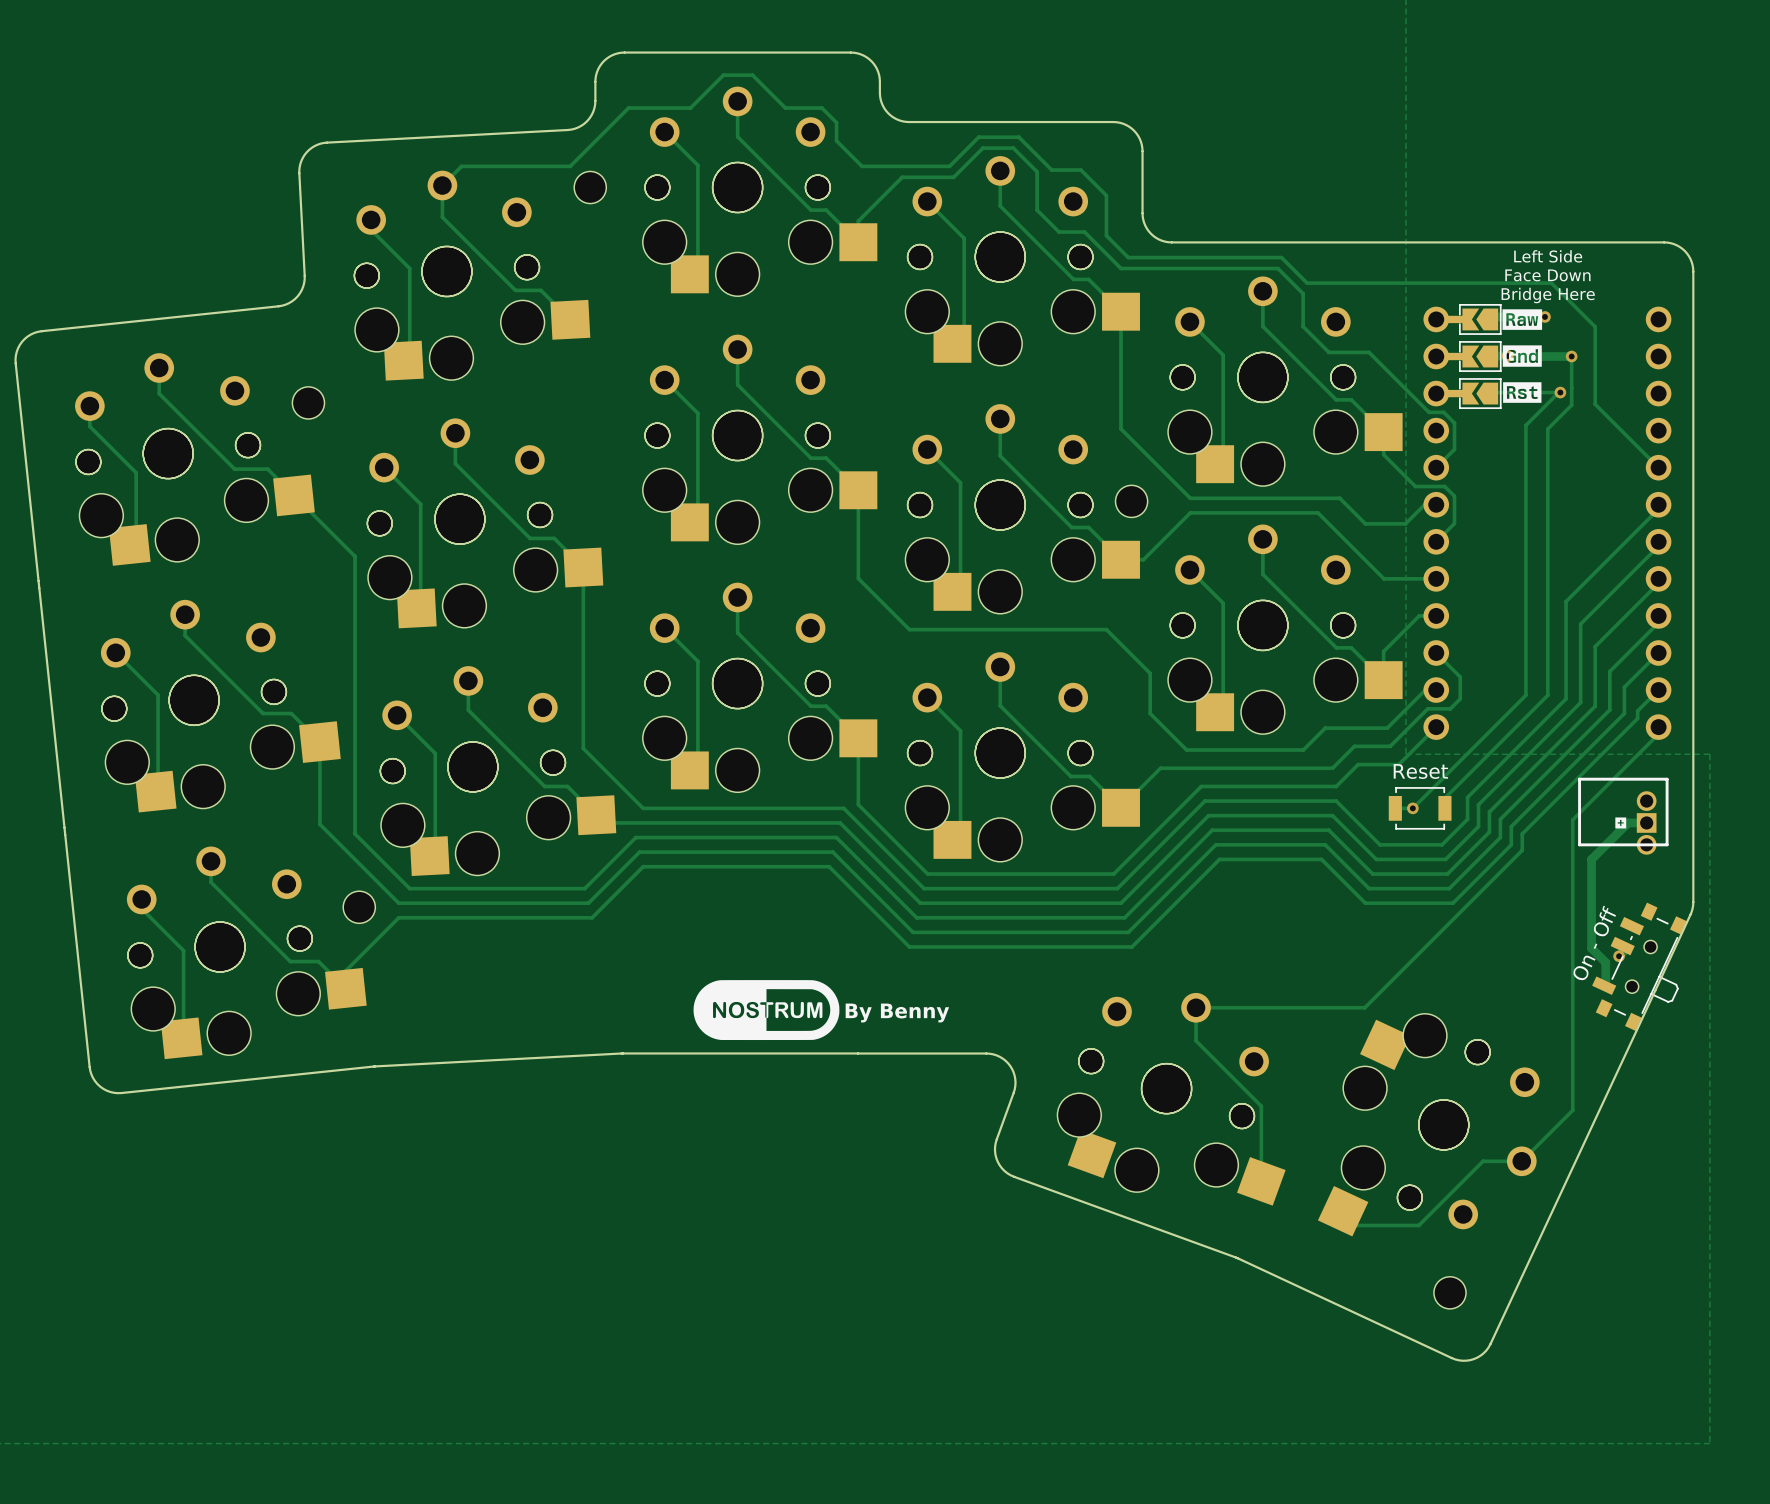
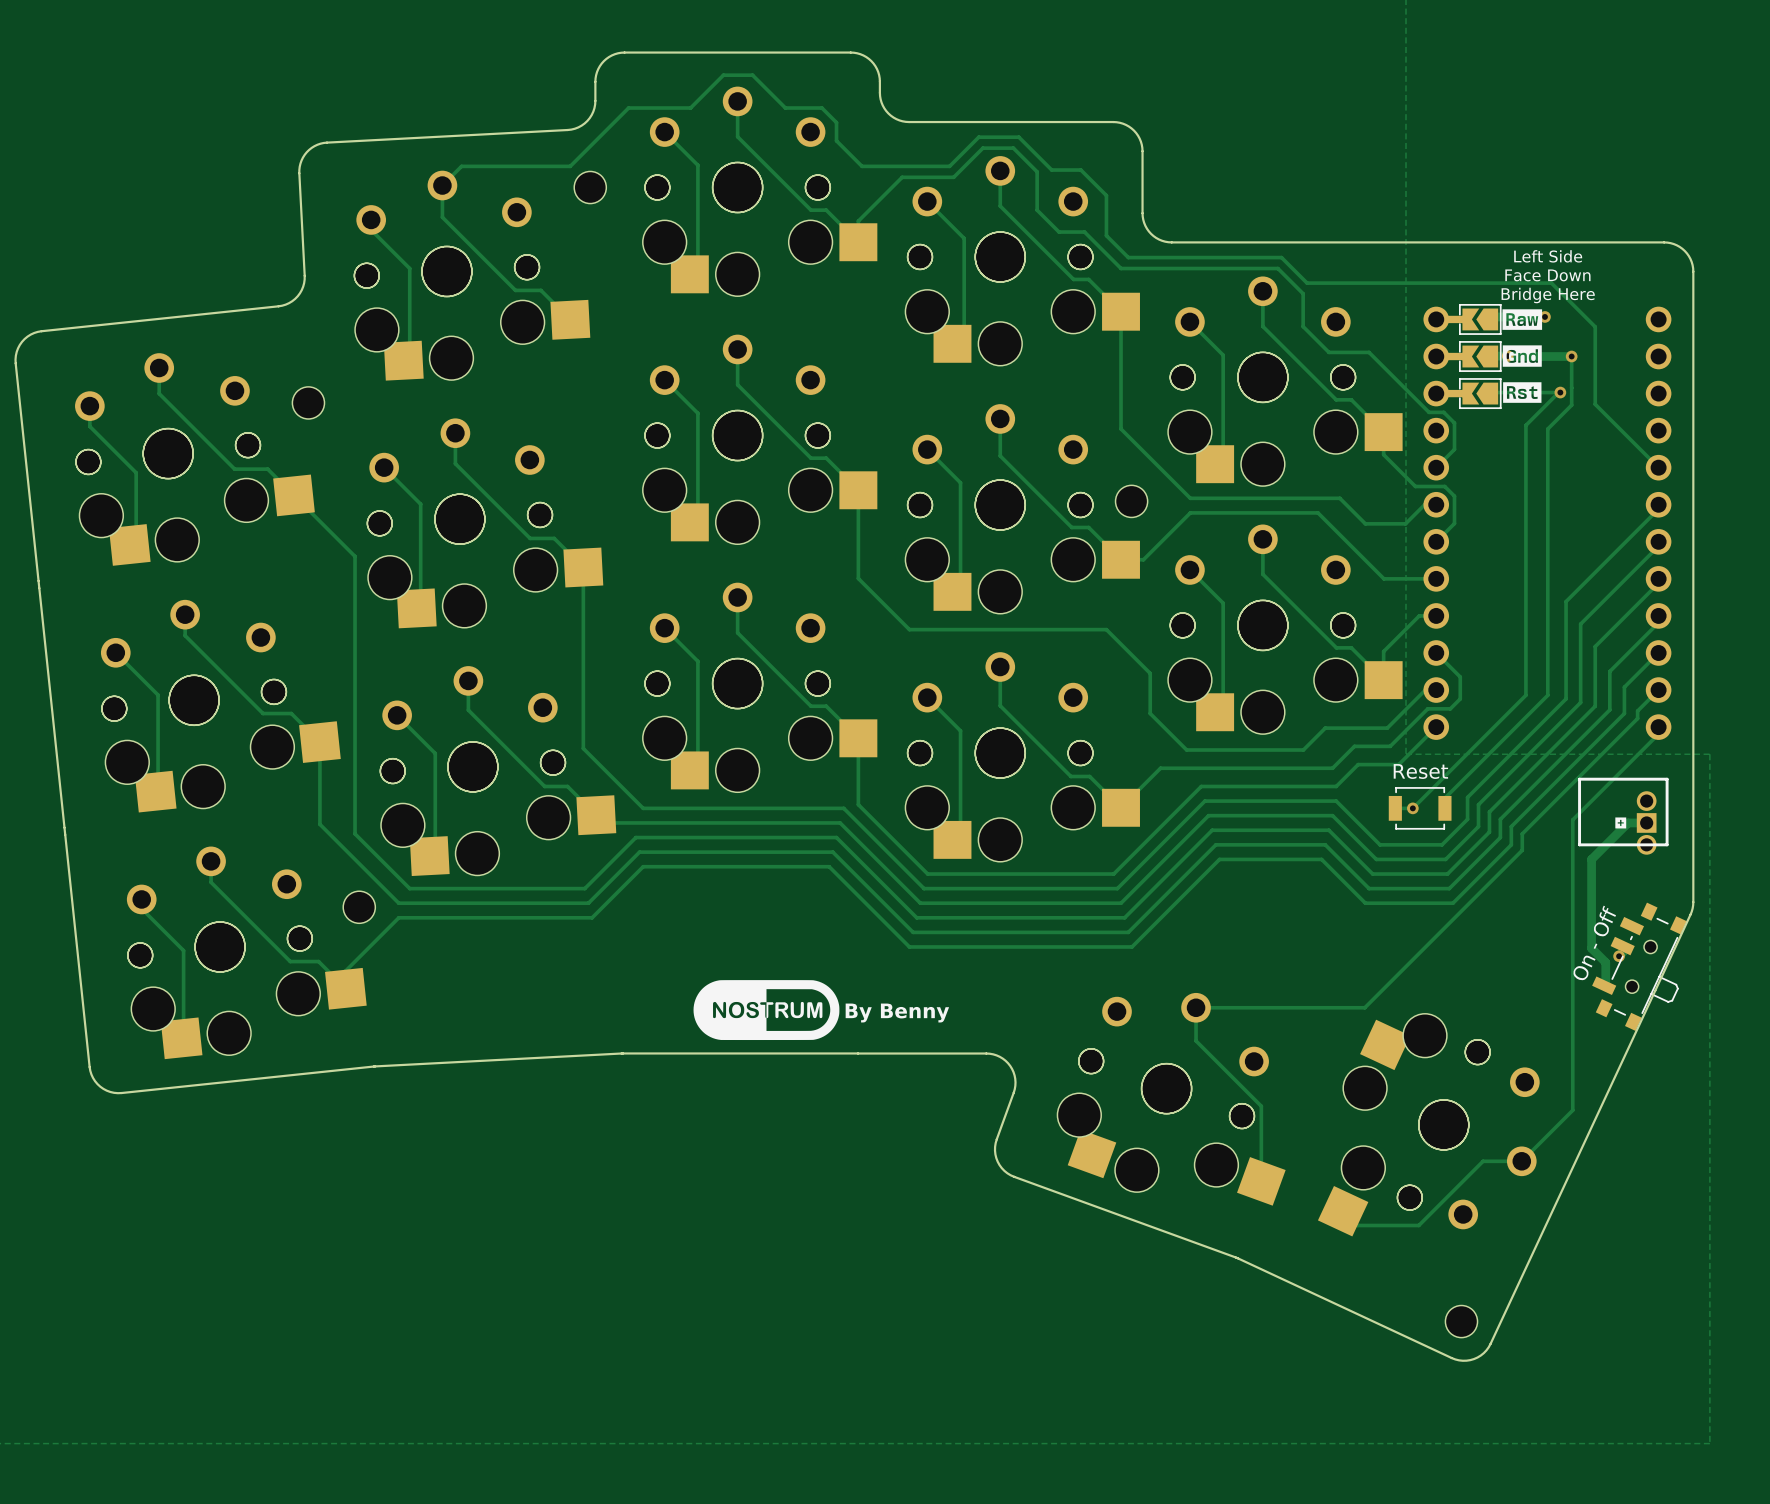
part position: (1449, 1292) -> (1461, 1321)

